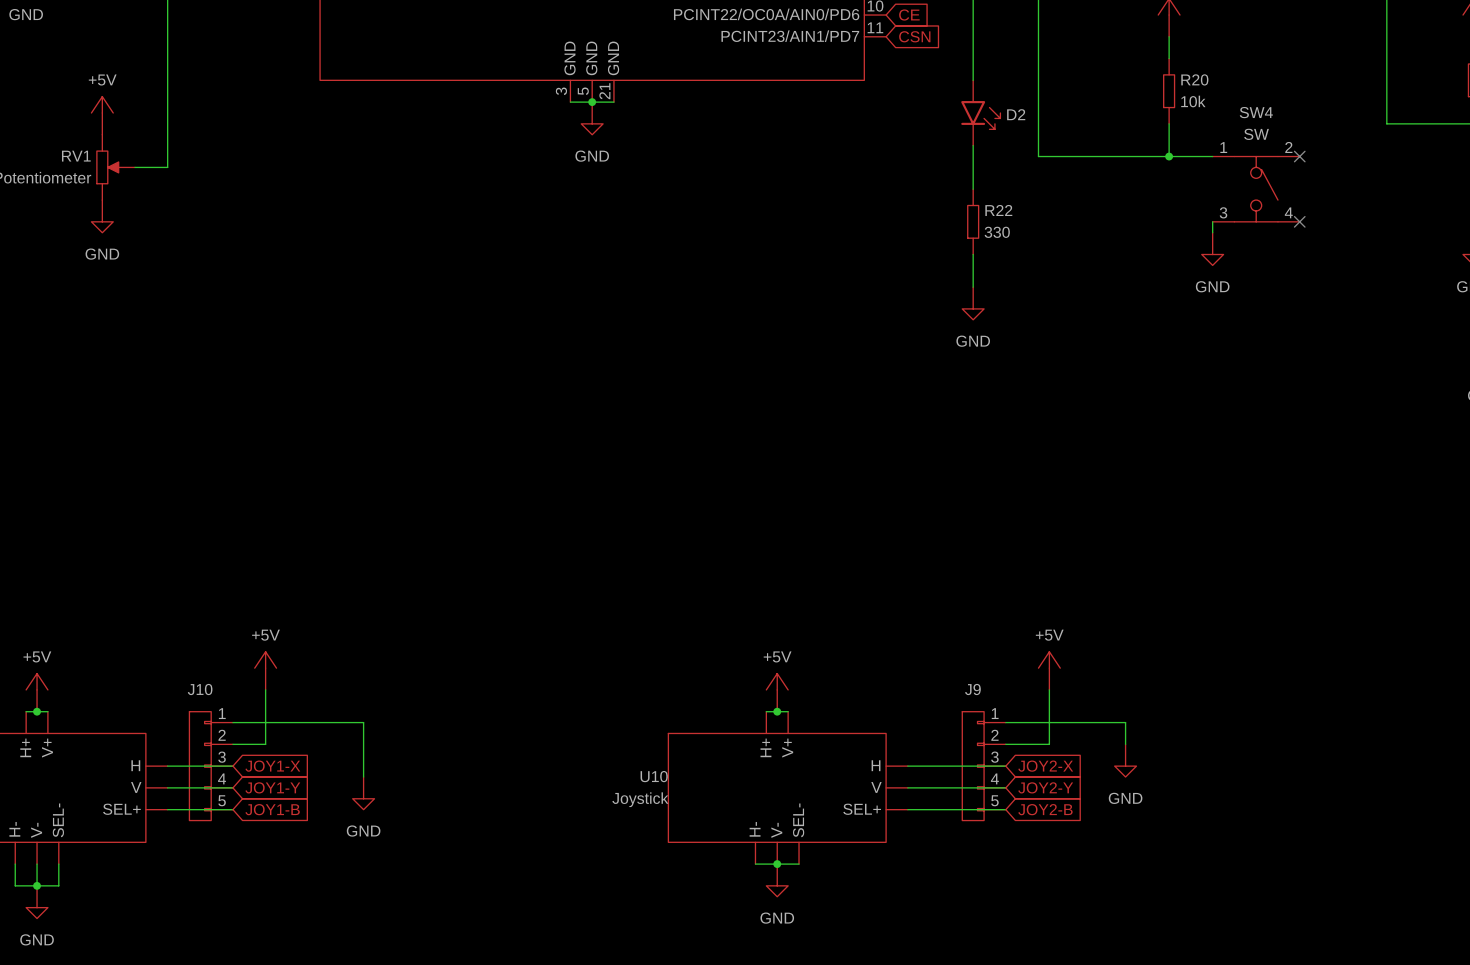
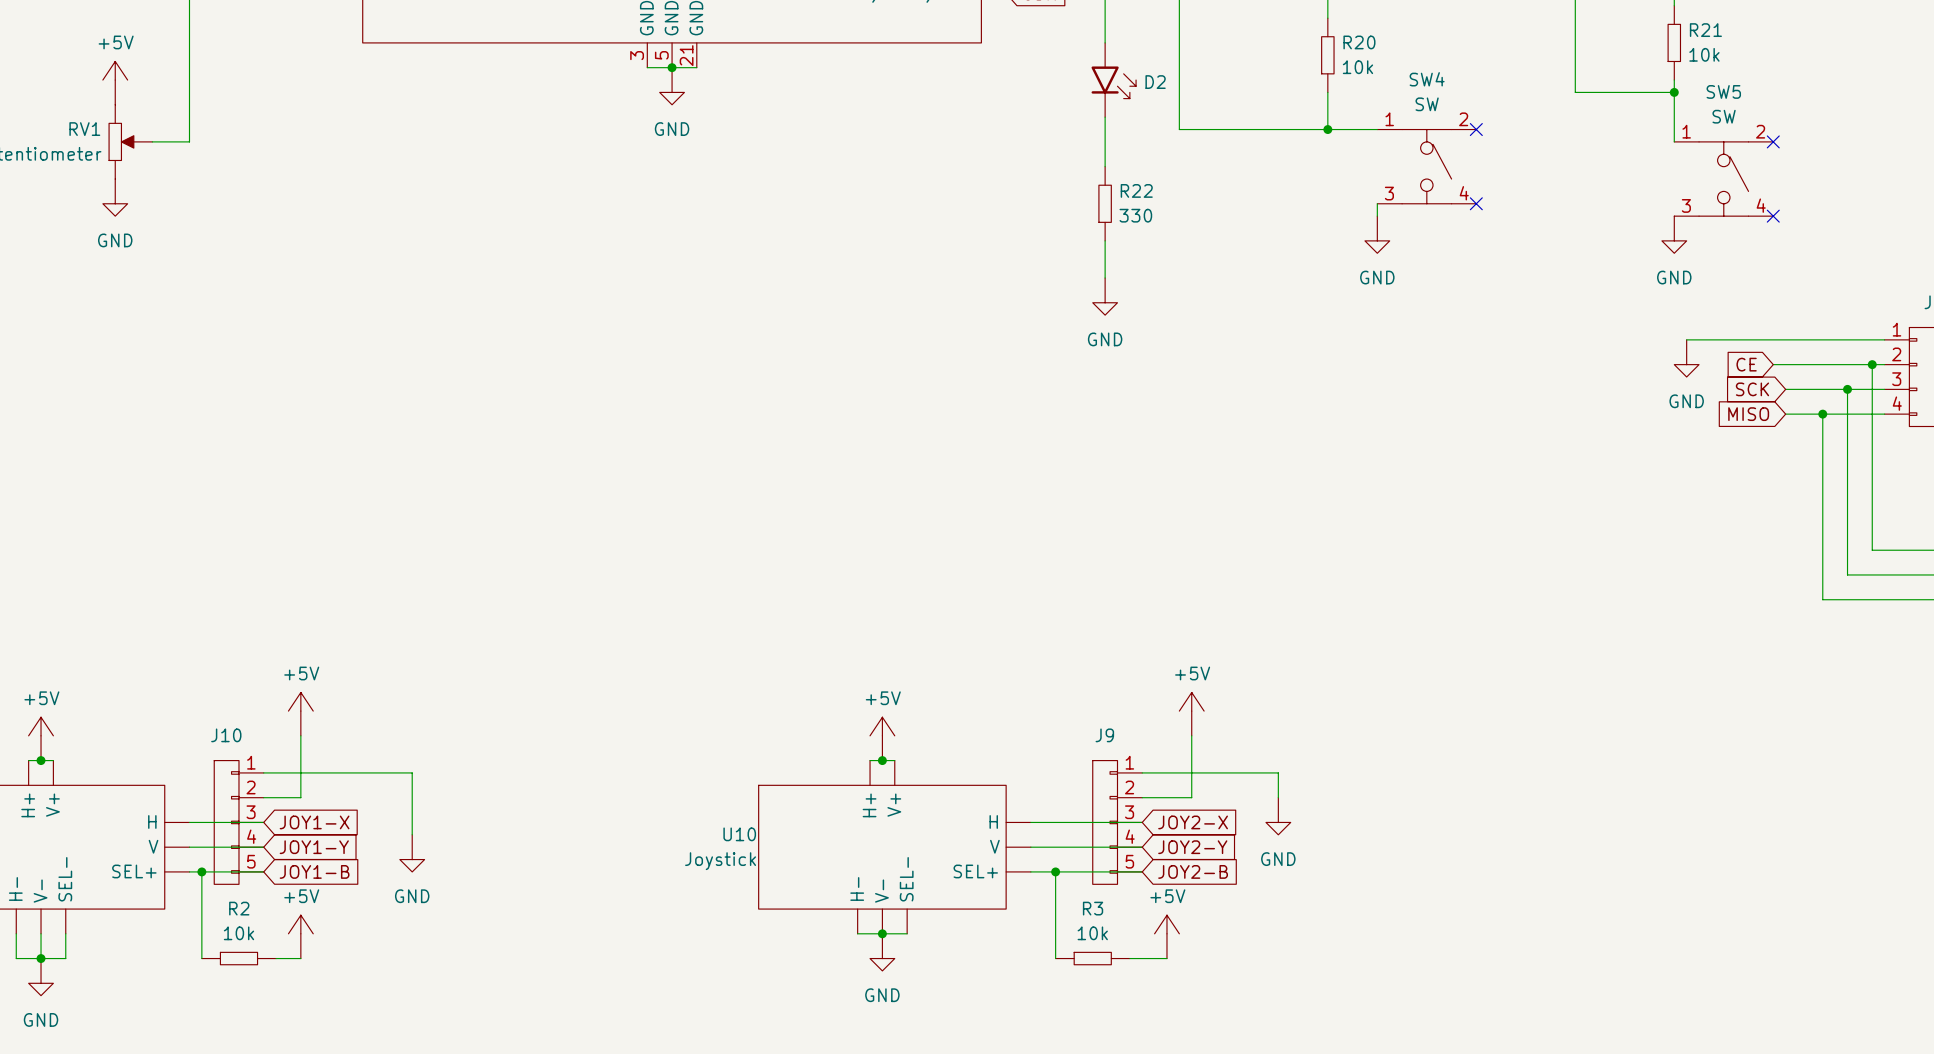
wire: none -> (201, 871) (201, 958)
junction: none -> (201, 871)
wire: none -> (1055, 871) (1055, 958)
junction: none -> (1055, 871)
power symbol: none -> +5V (300, 936)
power symbol: none -> +5V (1166, 936)
R2: none -> 10k (238, 958)
wire: none -> (276, 958) (300, 958)
R3: none -> 10k (1092, 958)
wire: none -> (1129, 958) (1166, 958)

